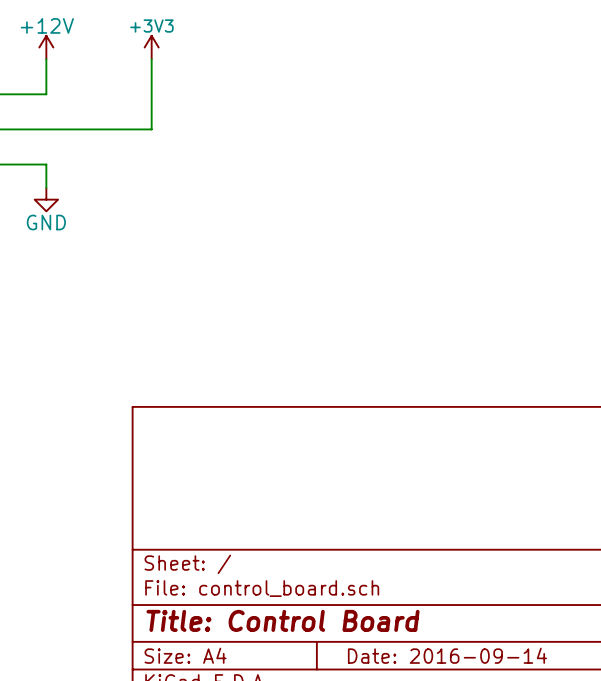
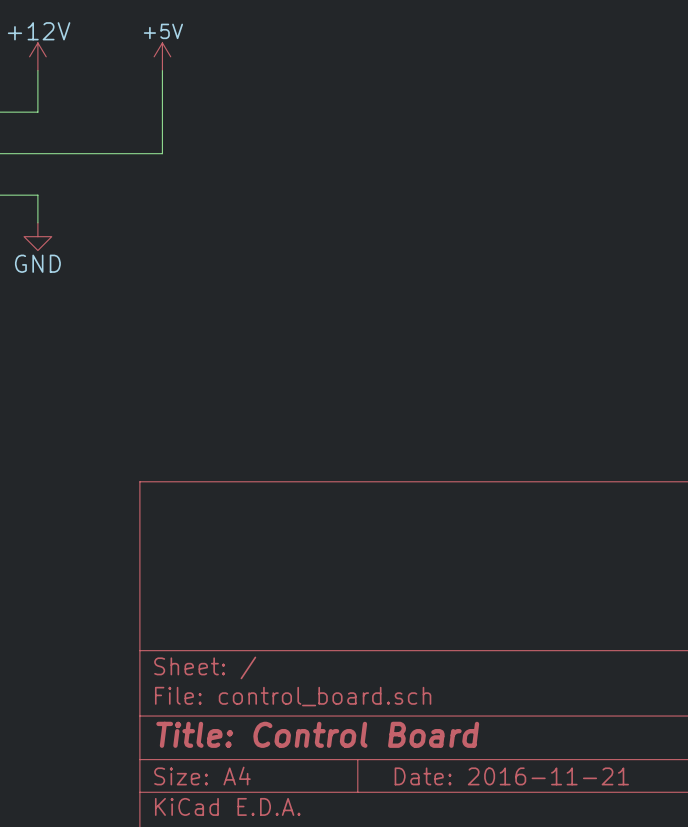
power symbol: +3V3 (151, 47) -> +5V (162, 56)
title block: Date: 2016-09-14 (447, 655) -> Date: 2016-11-21 (511, 776)

